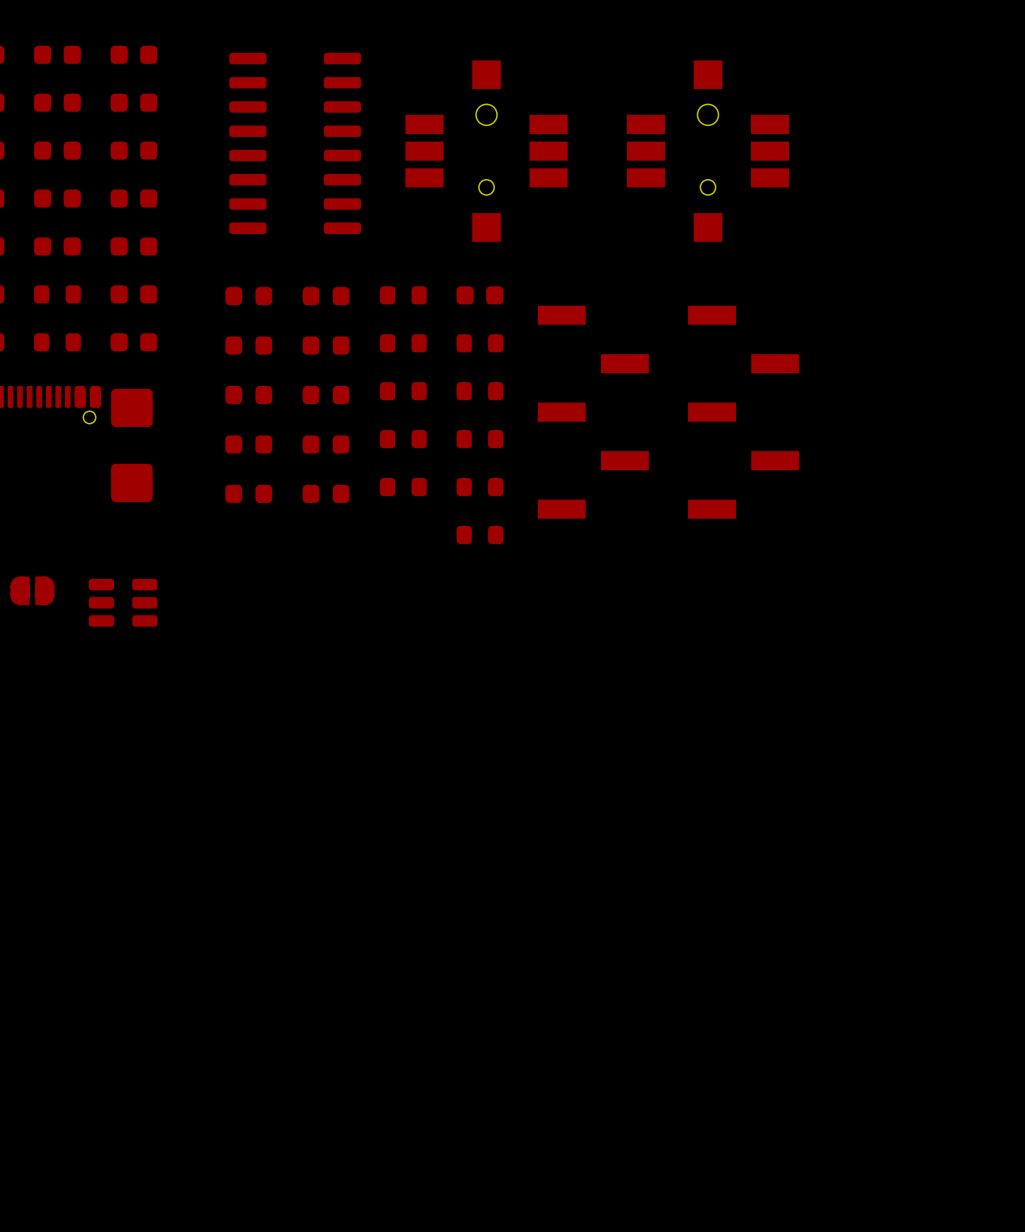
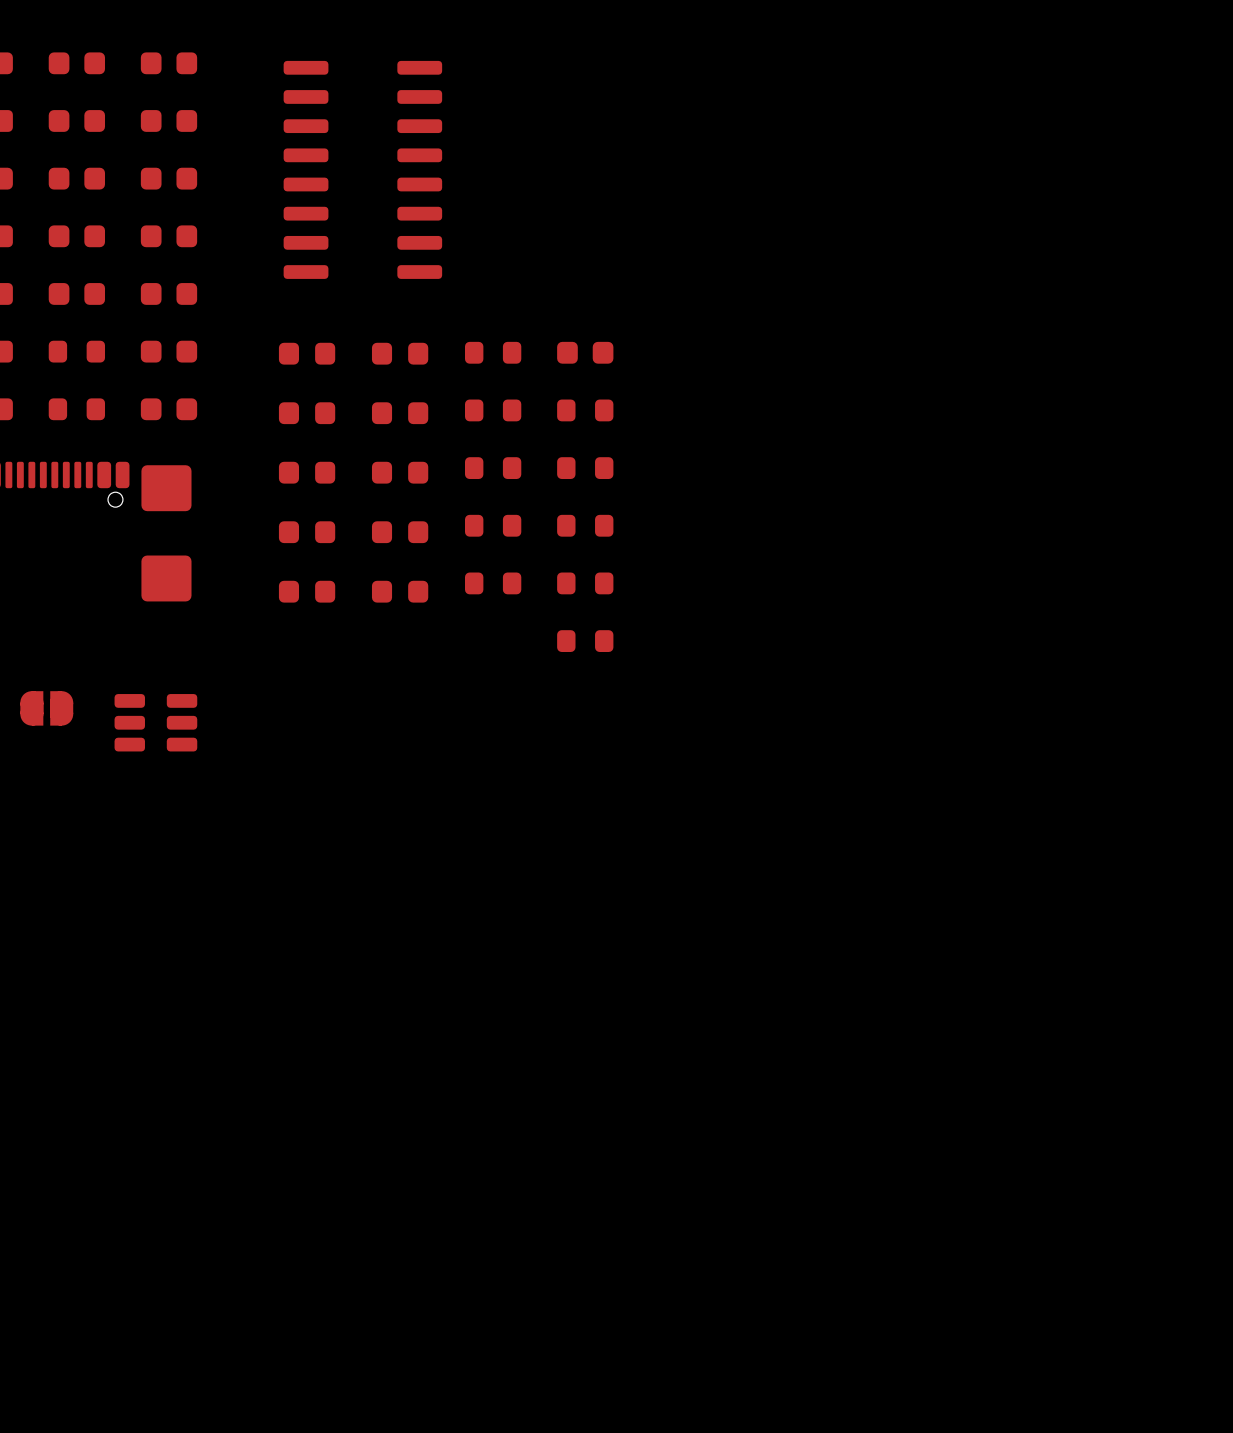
part: (486, 151) -> none
part: (707, 151) -> none
part: (593, 412) -> none
part: (743, 412) -> none

